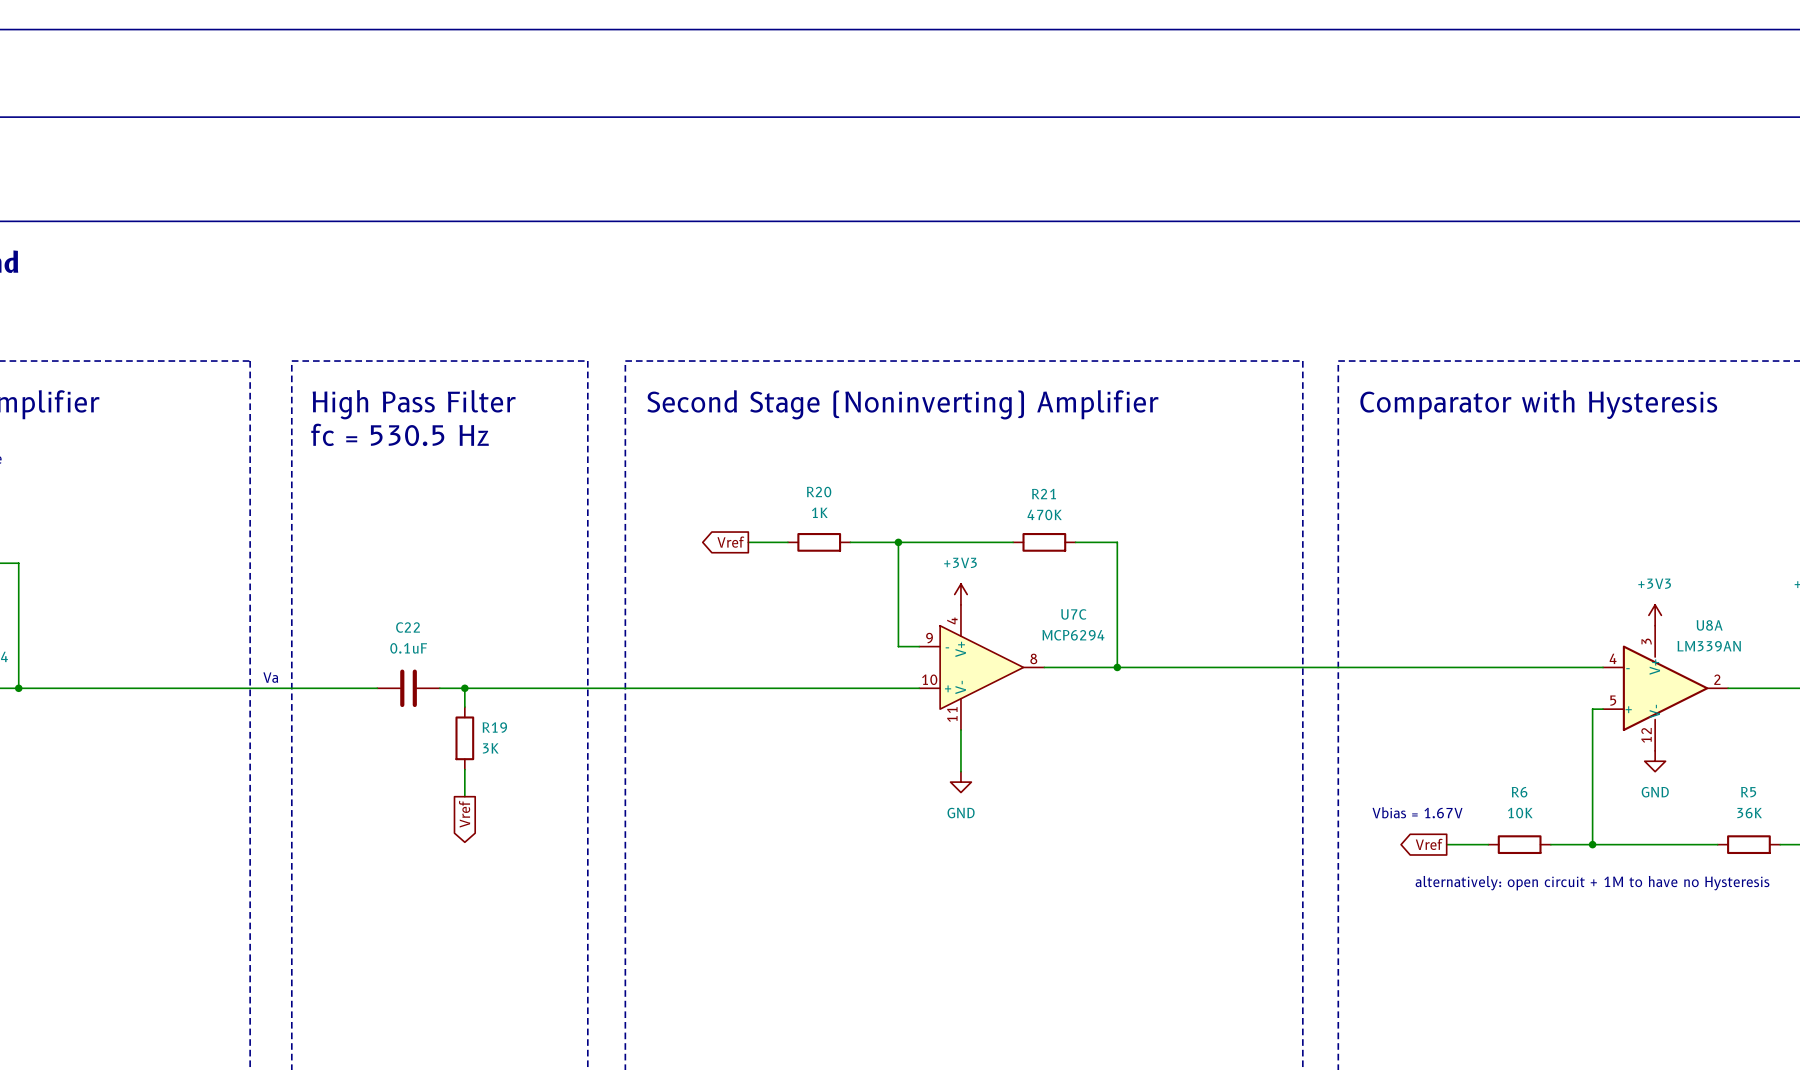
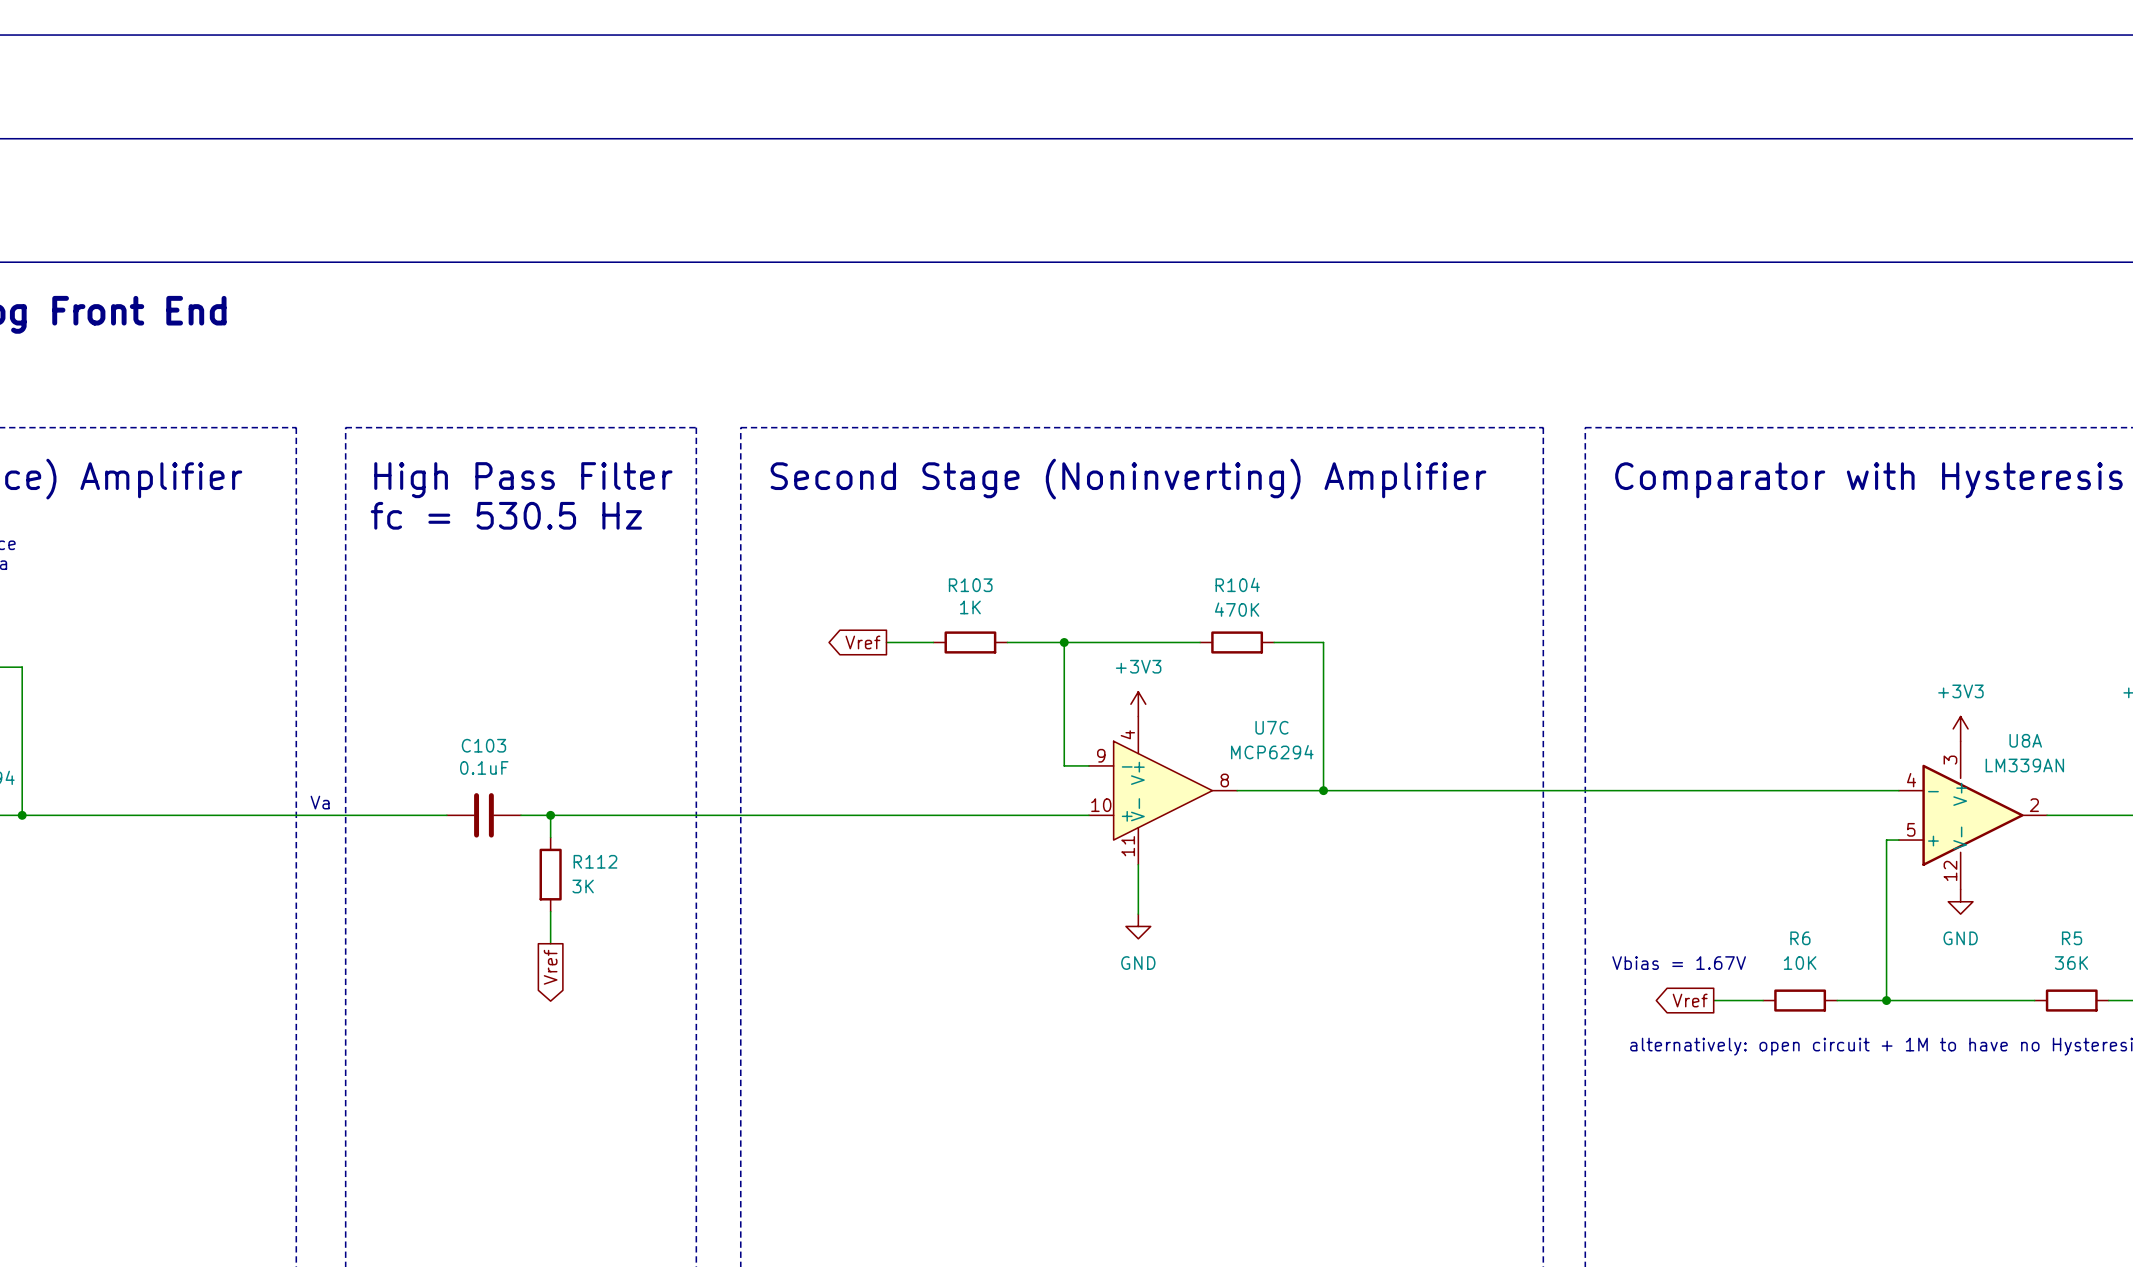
R20 name: R20 (819, 492) -> R103 (970, 585)
R21 name: R21 (1044, 494) -> R104 (1237, 584)
C22 name: C22 (408, 627) -> C103 (483, 745)
R19 name: R19 (494, 727) -> R112 (595, 861)

